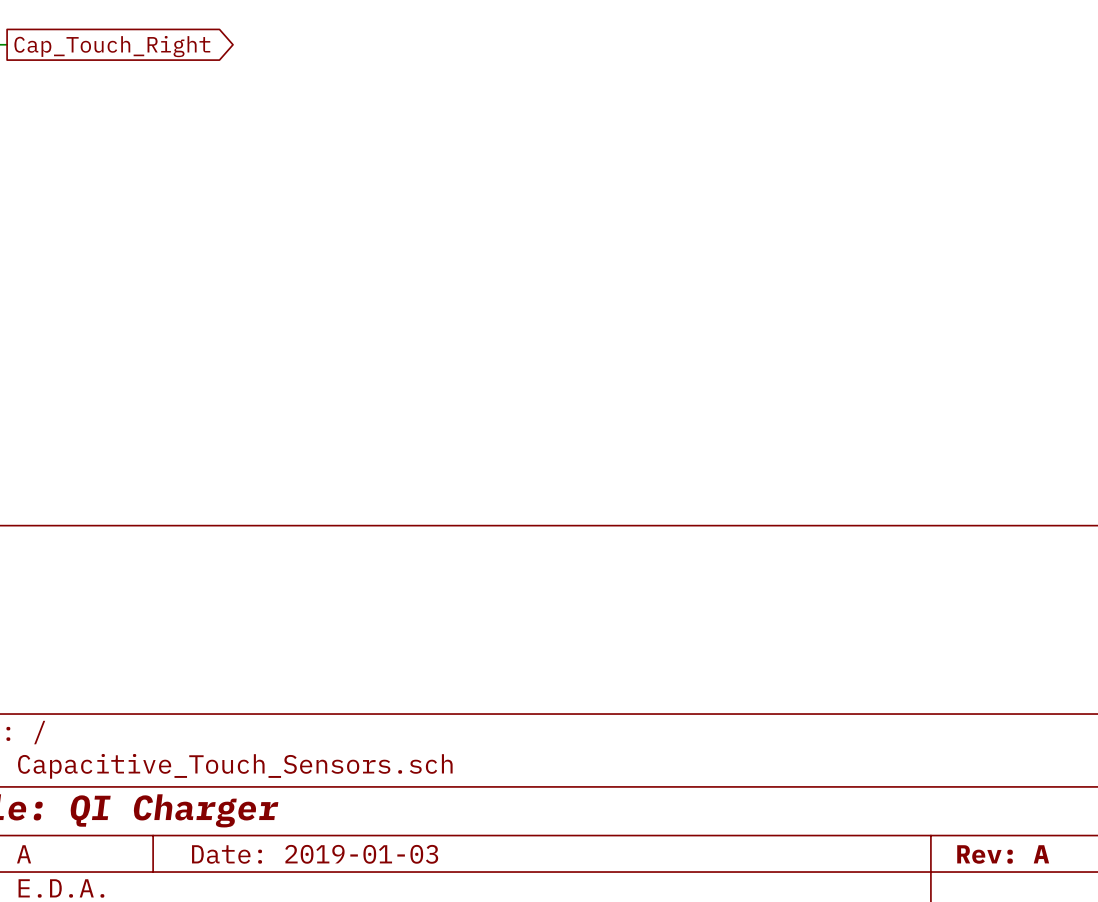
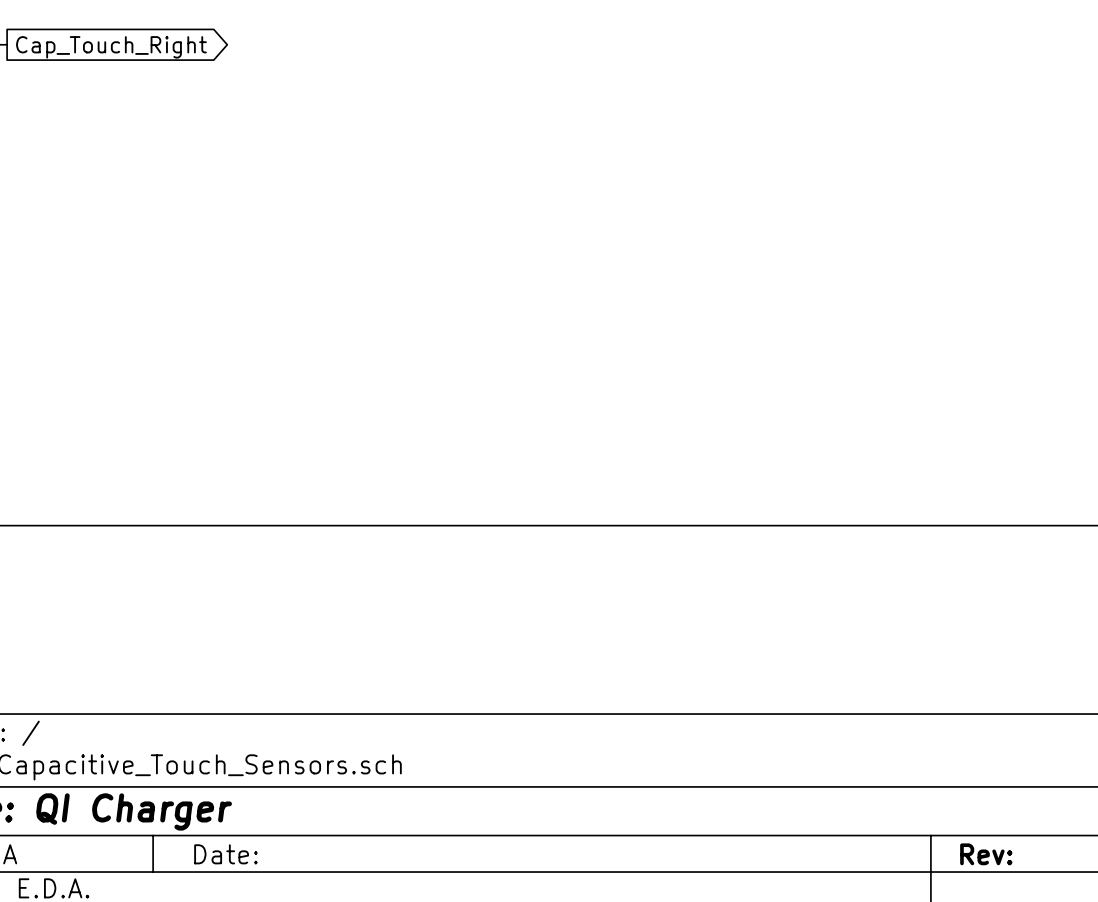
title block: Date: 2019-01-03 (315, 854) -> Date: (225, 854)
title block: Rev: A (1003, 854) -> Rev: (986, 854)

